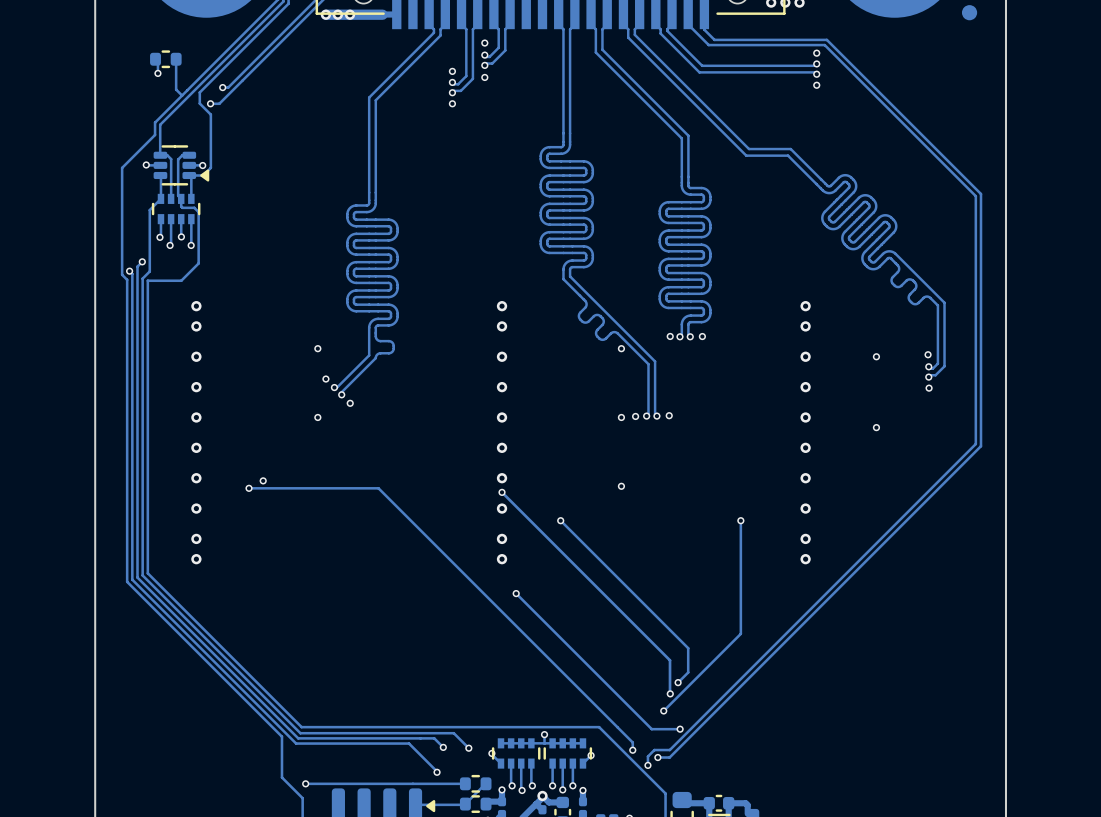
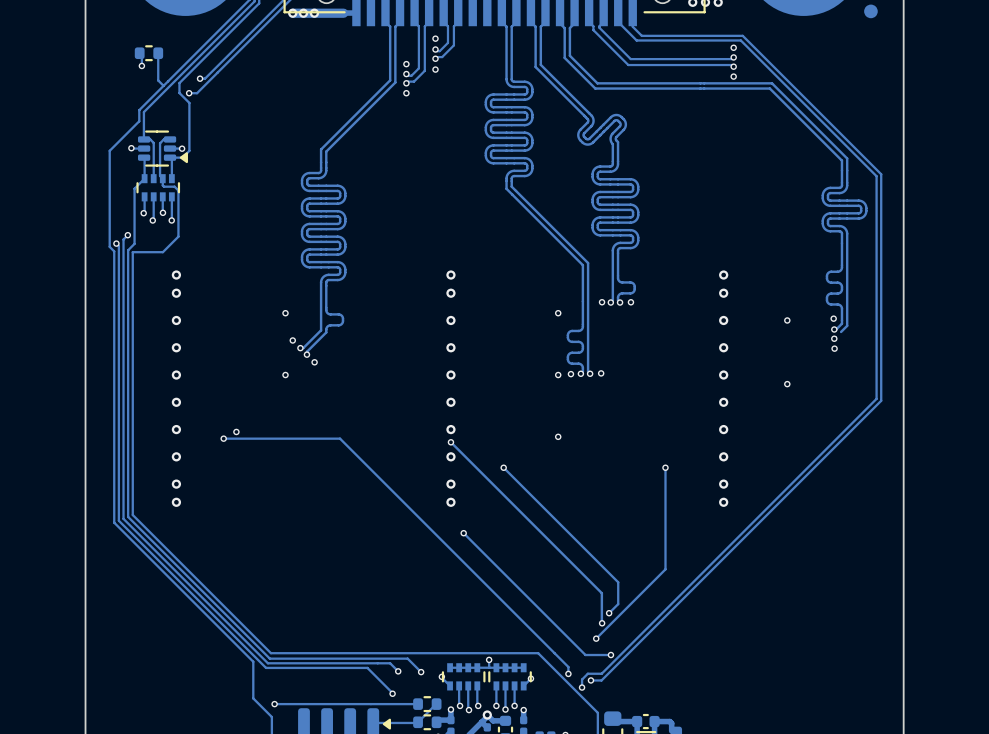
track: (623, 24) (628, 29) (628, 37) (746, 155) (788, 155) (827, 192) (833, 192) (843, 182) (846, 182) (849, 187) (824, 212) (822, 218) (827, 227) (835, 228) (863, 202) (869, 204) (868, 207) (843, 234) (842, 241) (847, 247) (857, 247) (883, 222) (889, 224) (889, 227) (864, 252) (862, 260) (867, 267) (874, 269) (890, 258) (899, 268) (891, 278) (892, 283) (899, 286) (909, 279) (915, 283) (915, 288) (908, 296) (911, 302) (917, 303) (927, 296) (937, 305) (937, 363) (932, 368) (928, 366) -> (560, 23) (564, 28) (564, 57) (595, 88) (769, 88) (841, 160) (841, 186) (825, 189) (822, 193) (823, 200) (829, 205) (859, 205) (861, 210) (859, 213) (828, 213) (822, 219) (822, 225) (825, 229) (840, 231) (841, 233) (841, 268) (838, 271) (829, 272) (827, 275) (828, 281) (839, 282) (841, 286) (839, 292) (829, 293) (827, 296) (828, 303) (839, 304) (841, 307) (841, 323) (834, 329)
track: (639, 24) (634, 29) (634, 34) (749, 149) (790, 149) (828, 186) (843, 175) (849, 176) (853, 179) (856, 185) (854, 190) (829, 216) (831, 222) (834, 221) (861, 196) (868, 195) (873, 199) (876, 205) (875, 210) (849, 236) (851, 242) (854, 241) (881, 216) (888, 215) (894, 220) (896, 226) (894, 231) (869, 258) (873, 262) (884, 252) (893, 252) (944, 302) (944, 366) (935, 375) (930, 375) -> none
track: none -> (574, 23) (569, 28) (569, 55) (597, 83) (772, 83) (847, 158) (846, 188) (841, 192) (829, 193) (828, 199) (861, 201) (865, 204) (866, 210) (864, 215) (860, 218) (830, 218) (828, 220) (829, 225) (842, 226) (847, 232) (847, 325) (841, 331)
track: (433, 29) (433, 32) (369, 97) (369, 203) (367, 205) (350, 207) (347, 212) (347, 218) (354, 225) (388, 226) (390, 231) (388, 233) (352, 234) (348, 239) (347, 246) (354, 254) (388, 254) (390, 260) (388, 262) (352, 262) (348, 267) (347, 275) (354, 282) (388, 282) (390, 288) (388, 290) (352, 291) (348, 296) (347, 303) (354, 310) (388, 311) (390, 316) (388, 318) (375, 319) (371, 322) (369, 327) (369, 355) (337, 387) -> (389, 26) (390, 80) (321, 149) (320, 172) (307, 173) (302, 179) (302, 186) (307, 190) (337, 190) (340, 193) (338, 198) (308, 198) (302, 204) (302, 212) (307, 215) (337, 216) (340, 218) (338, 223) (308, 223) (302, 229) (302, 236) (307, 241) (337, 241) (340, 244) (338, 249) (308, 249) (302, 254) (302, 262) (307, 266) (337, 267) (340, 269) (338, 274) (327, 275) (321, 279) (321, 330) (302, 348)
track: (440, 29) (440, 35) (375, 100) (375, 204) (370, 211) (355, 212) (353, 217) (356, 219) (392, 220) (396, 225) (397, 232) (390, 240) (356, 240) (353, 245) (356, 247) (392, 248) (396, 253) (397, 260) (390, 268) (356, 268) (353, 274) (356, 276) (392, 277) (396, 281) (397, 289) (390, 296) (356, 297) (353, 302) (356, 304) (392, 305) (396, 310) (397, 317) (392, 324) (377, 325) (375, 327) (376, 338) (391, 342) (393, 345) (392, 351) (377, 354) (341, 392) -> (395, 26) (395, 82) (326, 151) (326, 171) (324, 175) (307, 180) (309, 185) (338, 185) (344, 190) (344, 198) (340, 203) (309, 203) (307, 206) (309, 211) (338, 211) (343, 214) (345, 223) (341, 228) (309, 229) (307, 234) (309, 236) (341, 237) (345, 242) (344, 250) (338, 254) (309, 254) (307, 259) (309, 262) (340, 262) (344, 266) (345, 272) (341, 279) (328, 280) (326, 282) (326, 311) (329, 314) (340, 315) (342, 322) (339, 325) (327, 326) (326, 332) (306, 352)
track: (563, 29) (563, 145) (561, 147) (545, 148) (541, 152) (540, 160) (547, 167) (584, 167) (586, 173) (583, 175) (547, 175) (541, 180) (540, 188) (547, 195) (584, 196) (586, 201) (583, 203) (547, 204) (541, 208) (540, 216) (547, 224) (584, 224) (586, 230) (584, 232) (546, 232) (541, 237) (541, 246) (548, 252) (585, 254) (584, 260) (571, 260) (566, 263) (563, 268) (563, 279) (586, 302) (585, 306) (579, 314) (580, 319) (586, 322) (597, 314) (603, 318) (603, 323) (596, 332) (599, 338) (604, 339) (611, 332) (616, 332) (648, 364) (648, 414) -> (506, 26) (506, 81) (511, 86) (525, 87) (527, 92) (524, 94) (490, 94) (486, 98) (486, 106) (492, 112) (525, 112) (527, 117) (525, 119) (490, 120) (486, 124) (486, 131) (492, 137) (525, 137) (527, 143) (525, 145) (490, 145) (486, 149) (486, 157) (492, 163) (526, 164) (525, 170) (512, 171) (508, 173) (506, 188) (582, 265) (582, 327) (579, 330) (570, 331) (567, 335) (569, 341) (579, 341) (582, 344) (581, 351) (570, 353) (567, 357) (569, 363) (581, 364) (582, 372)
track: (570, 29) (570, 145) (564, 153) (548, 154) (547, 159) (549, 161) (586, 161) (591, 165) (592, 174) (586, 181) (549, 182) (547, 187) (549, 189) (586, 189) (591, 194) (592, 202) (586, 210) (549, 210) (547, 215) (549, 218) (586, 218) (591, 222) (592, 230) (586, 238) (549, 238) (547, 244) (549, 246) (585, 246) (591, 250) (592, 258) (590, 263) (585, 267) (571, 267) (570, 276) (655, 361) (655, 414) -> (512, 26) (511, 79) (528, 82) (531, 86) (532, 93) (525, 99) (492, 99) (491, 105) (493, 107) (527, 107) (531, 111) (532, 119) (525, 125) (492, 125) (491, 130) (493, 132) (527, 133) (531, 137) (532, 143) (526, 150) (492, 150) (491, 156) (493, 158) (525, 158) (530, 160) (532, 164) (531, 172) (526, 175) (512, 176) (511, 186) (588, 263) (588, 372)
track: (595, 29) (595, 52) (681, 138) (683, 190) (688, 194) (703, 196) (701, 202) (666, 202) (659, 210) (660, 217) (665, 222) (701, 222) (703, 225) (702, 230) (667, 230) (660, 237) (660, 245) (665, 250) (701, 251) (703, 253) (702, 258) (667, 258) (660, 265) (660, 274) (665, 278) (701, 279) (703, 281) (702, 287) (667, 287) (660, 292) (660, 301) (665, 307) (703, 309) (702, 315) (688, 315) (683, 319) (681, 334) -> (535, 26) (535, 67) (588, 119) (578, 132) (579, 139) (584, 144) (590, 144) (615, 120) (620, 123) (610, 137) (612, 144) (612, 165) (596, 167) (592, 174) (593, 180) (597, 184) (630, 184) (633, 186) (631, 191) (599, 192) (592, 197) (593, 205) (597, 209) (630, 209) (633, 212) (631, 217) (599, 217) (592, 223) (593, 231) (597, 234) (630, 235) (632, 237) (631, 242) (617, 243) (613, 248) (612, 300)
track: (602, 29) (602, 49) (688, 135) (688, 186) (704, 188) (710, 194) (709, 203) (704, 208) (668, 208) (666, 210) (668, 216) (703, 216) (710, 224) (709, 231) (704, 236) (668, 237) (666, 239) (668, 244) (702, 244) (710, 251) (709, 259) (704, 264) (668, 265) (666, 267) (668, 272) (702, 273) (710, 279) (709, 288) (704, 293) (666, 295) (668, 301) (702, 301) (709, 305) (710, 313) (708, 318) (703, 321) (689, 322) (688, 334) -> (541, 26) (540, 64) (593, 118) (592, 124) (583, 133) (584, 136) (589, 138) (613, 115) (620, 116) (625, 122) (624, 128) (615, 138) (618, 142) (617, 167) (612, 171) (599, 171) (597, 174) (599, 179) (633, 179) (638, 186) (637, 192) (633, 196) (599, 197) (597, 199) (599, 204) (631, 204) (638, 210) (637, 218) (633, 222) (600, 222) (597, 224) (599, 230) (631, 230) (638, 236) (637, 242) (634, 246) (618, 249) (618, 279) (621, 282) (632, 282) (634, 286) (632, 292) (619, 294) (618, 300)

